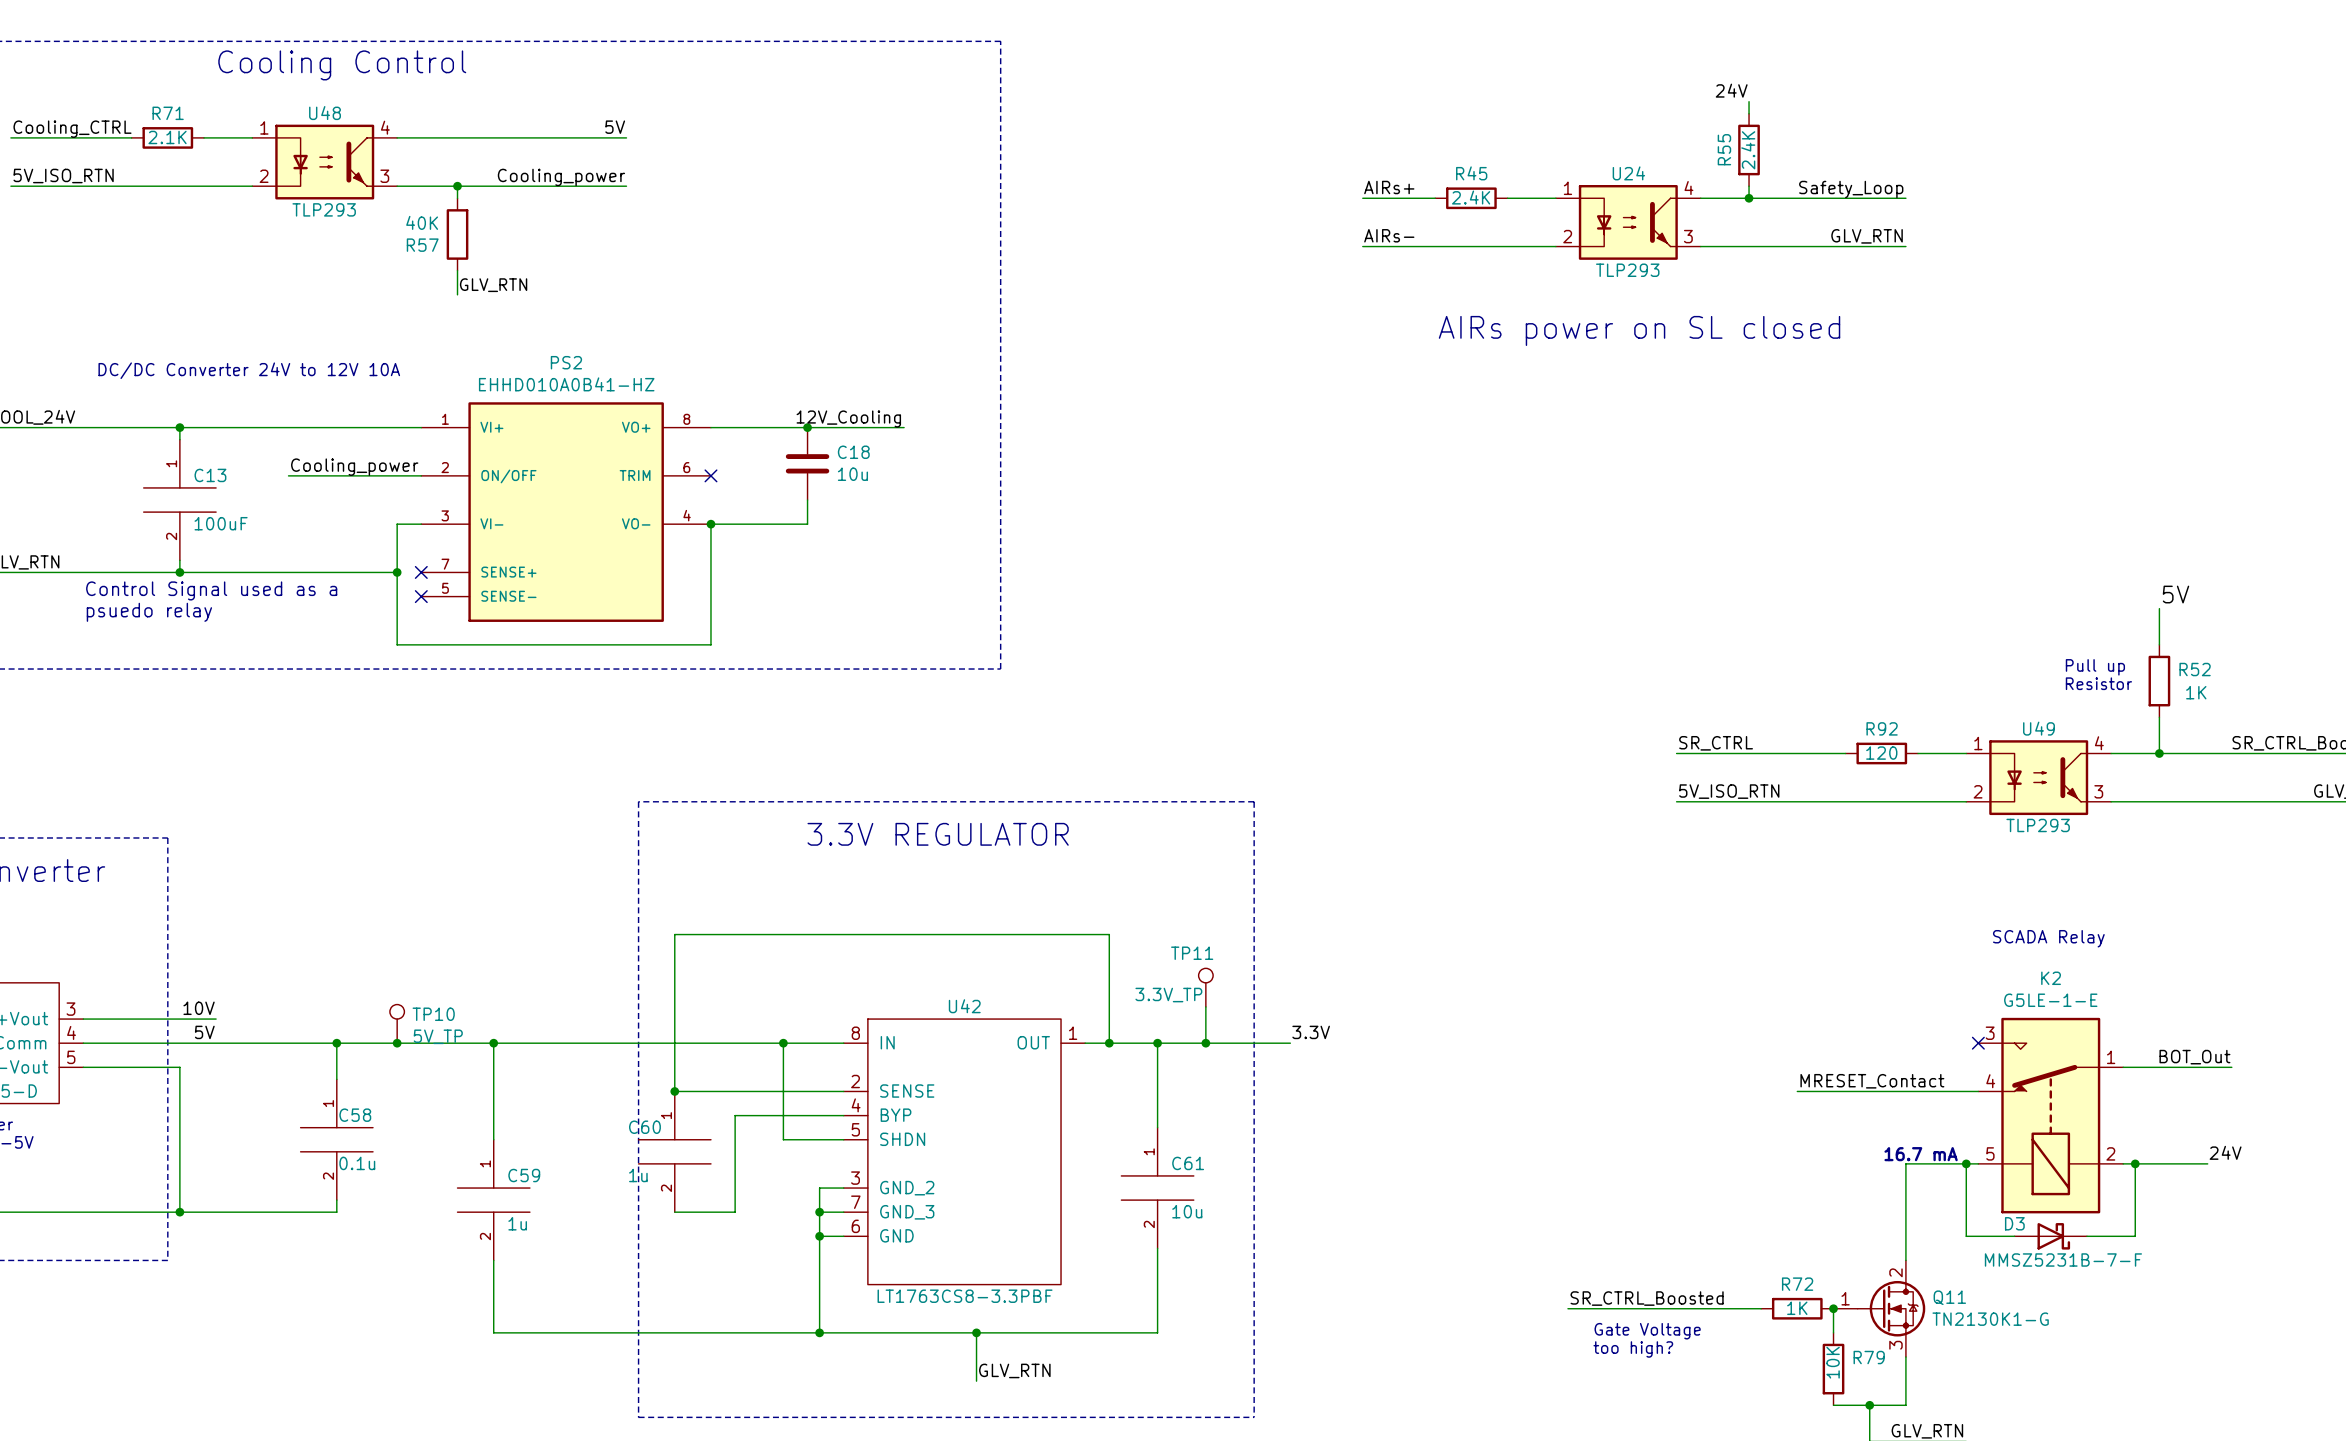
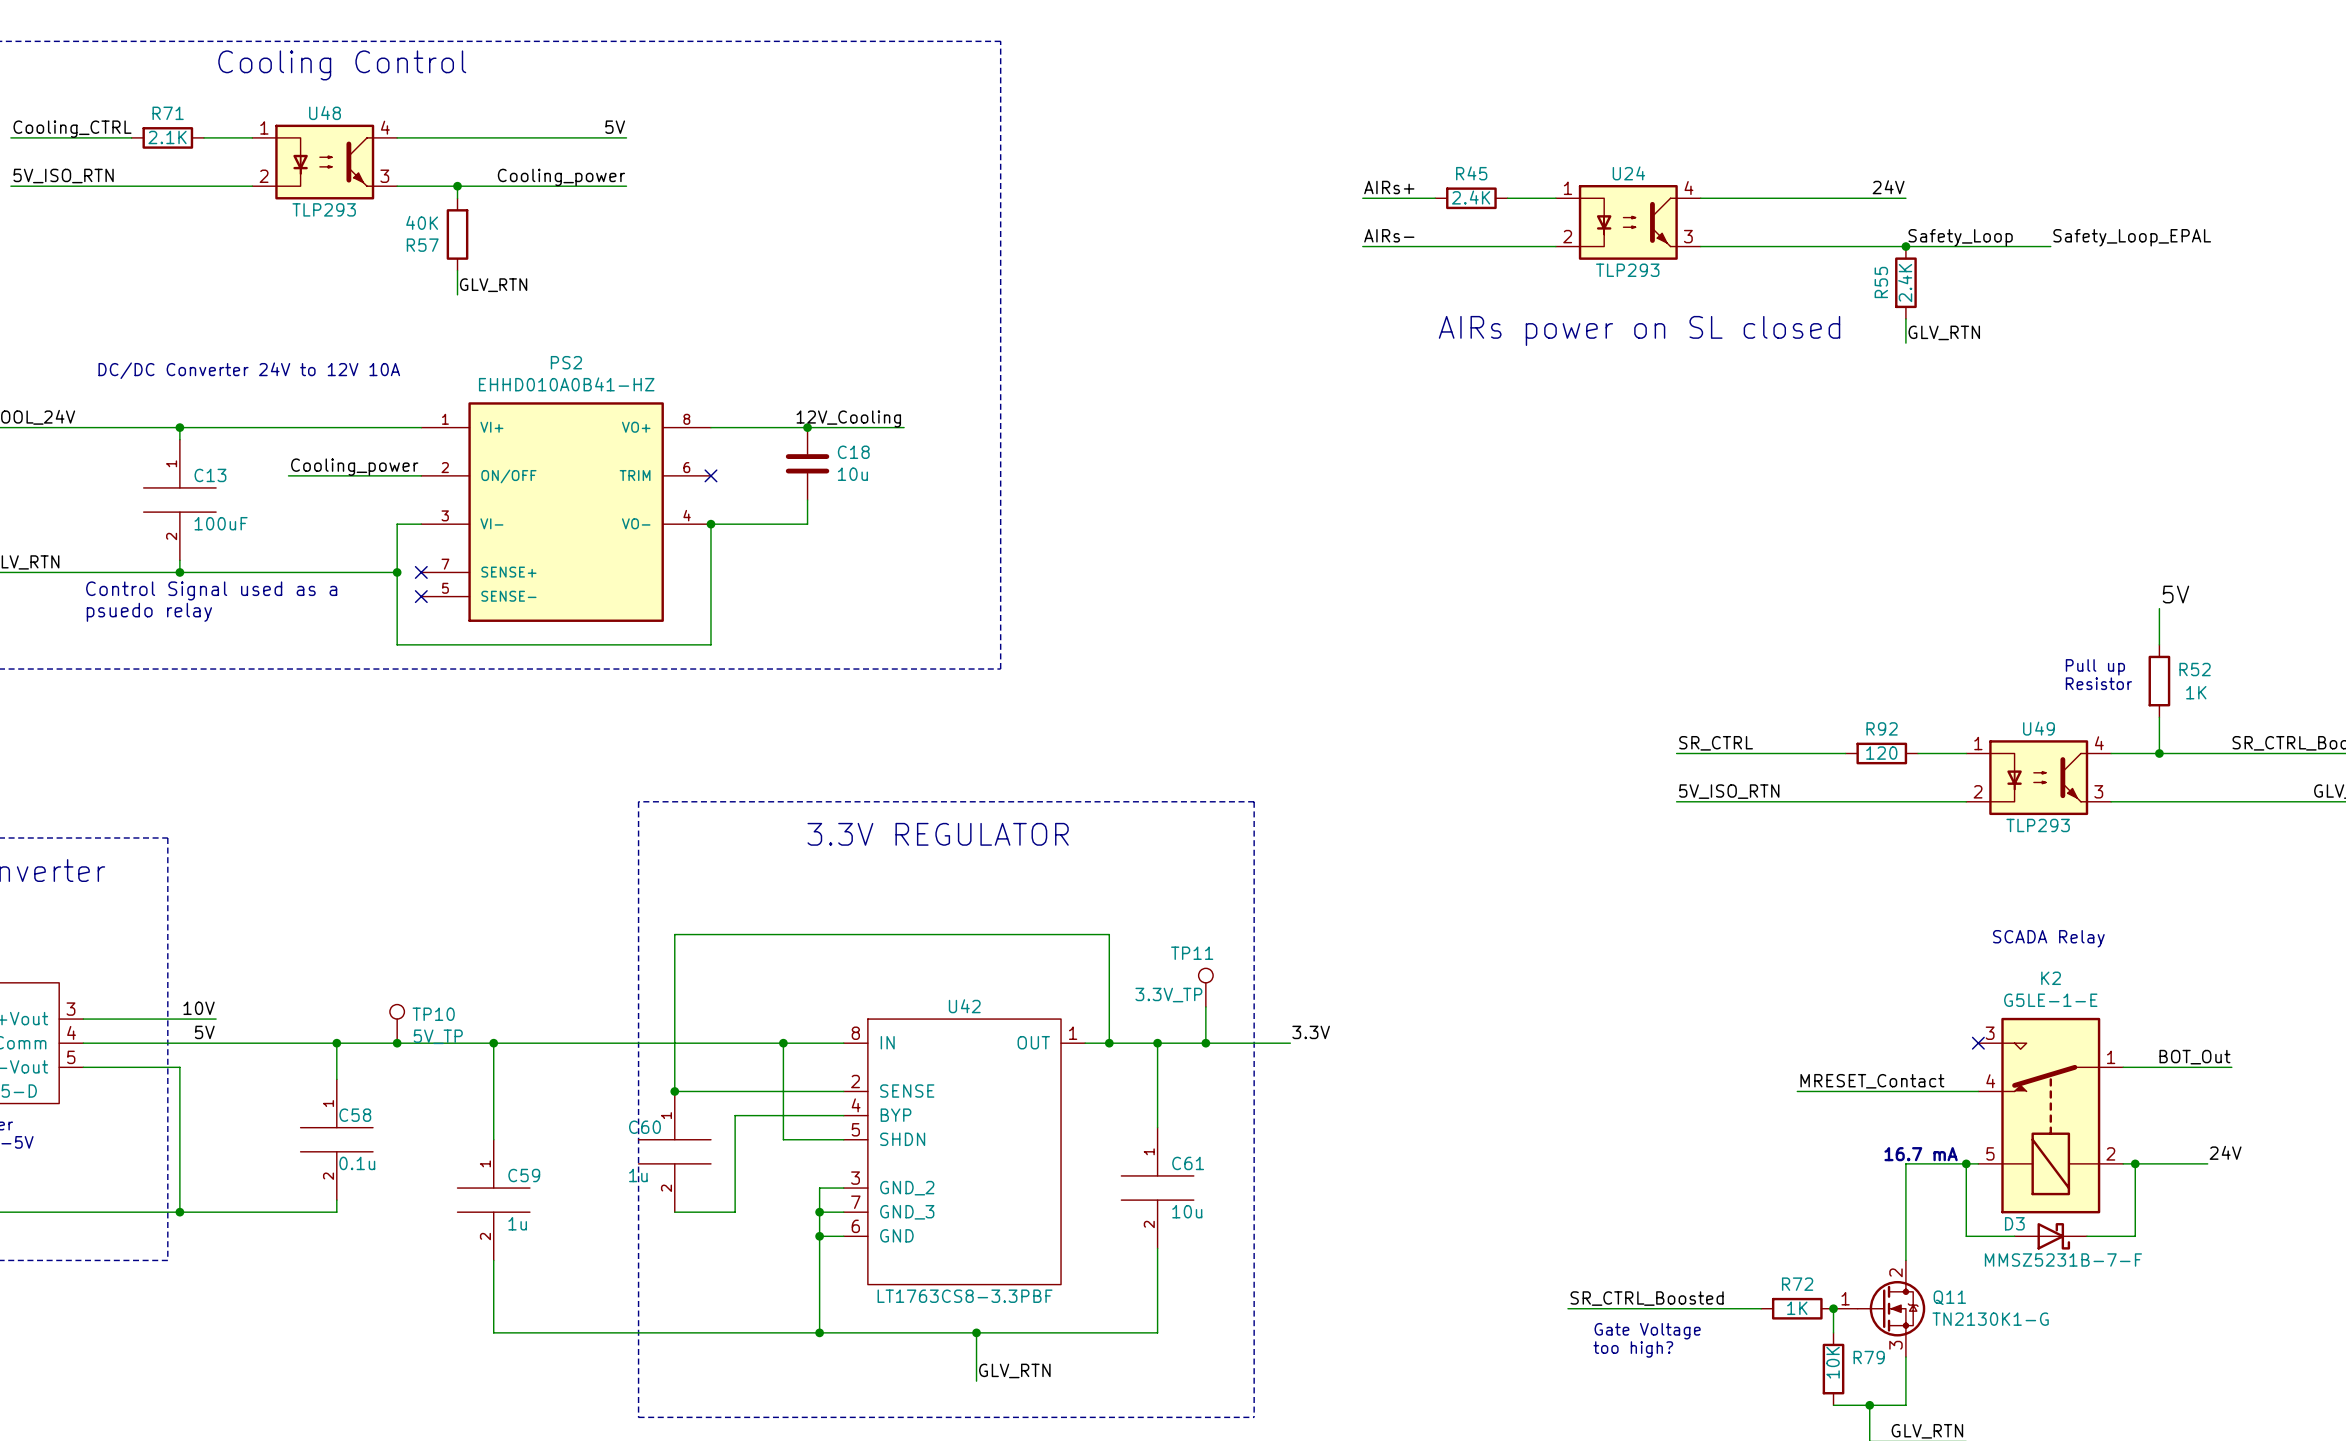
label: 24V (1731, 90) -> none
wire: (1749, 101) (1749, 113) -> none
R55 position: (1749, 149) -> (1905, 282)
wire: (1749, 186) (1749, 198) -> none
label: Safety_Loop (1851, 189) -> 24V (1888, 187)
junction: (1749, 198) -> none
label: GLV_RTN (1867, 236) -> Safety_Loop (1960, 237)
label: none -> Safety_Loop_EPAL (2132, 237)
wire: none -> (1905, 246) (2050, 246)
junction: none -> (1905, 246)
wire: none -> (1905, 318) (1905, 343)
label: none -> GLV_RTN (1944, 332)

